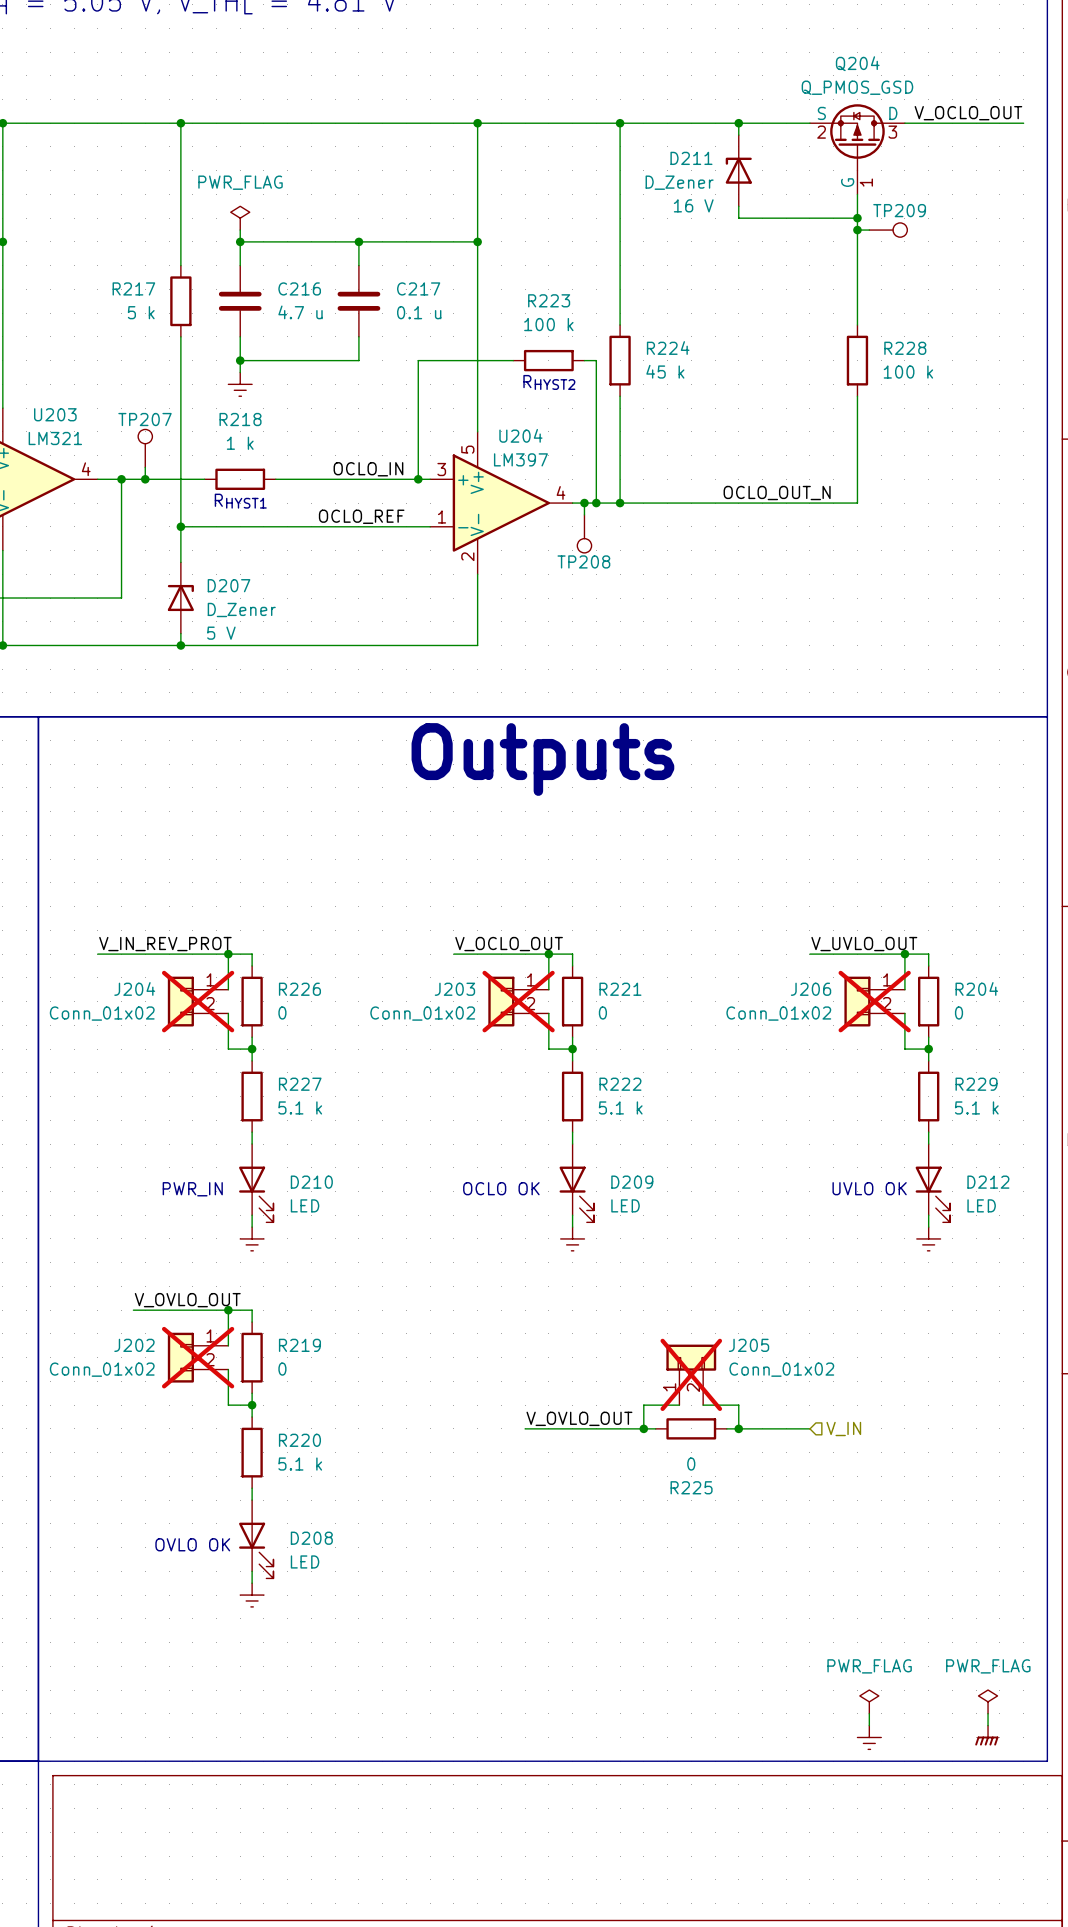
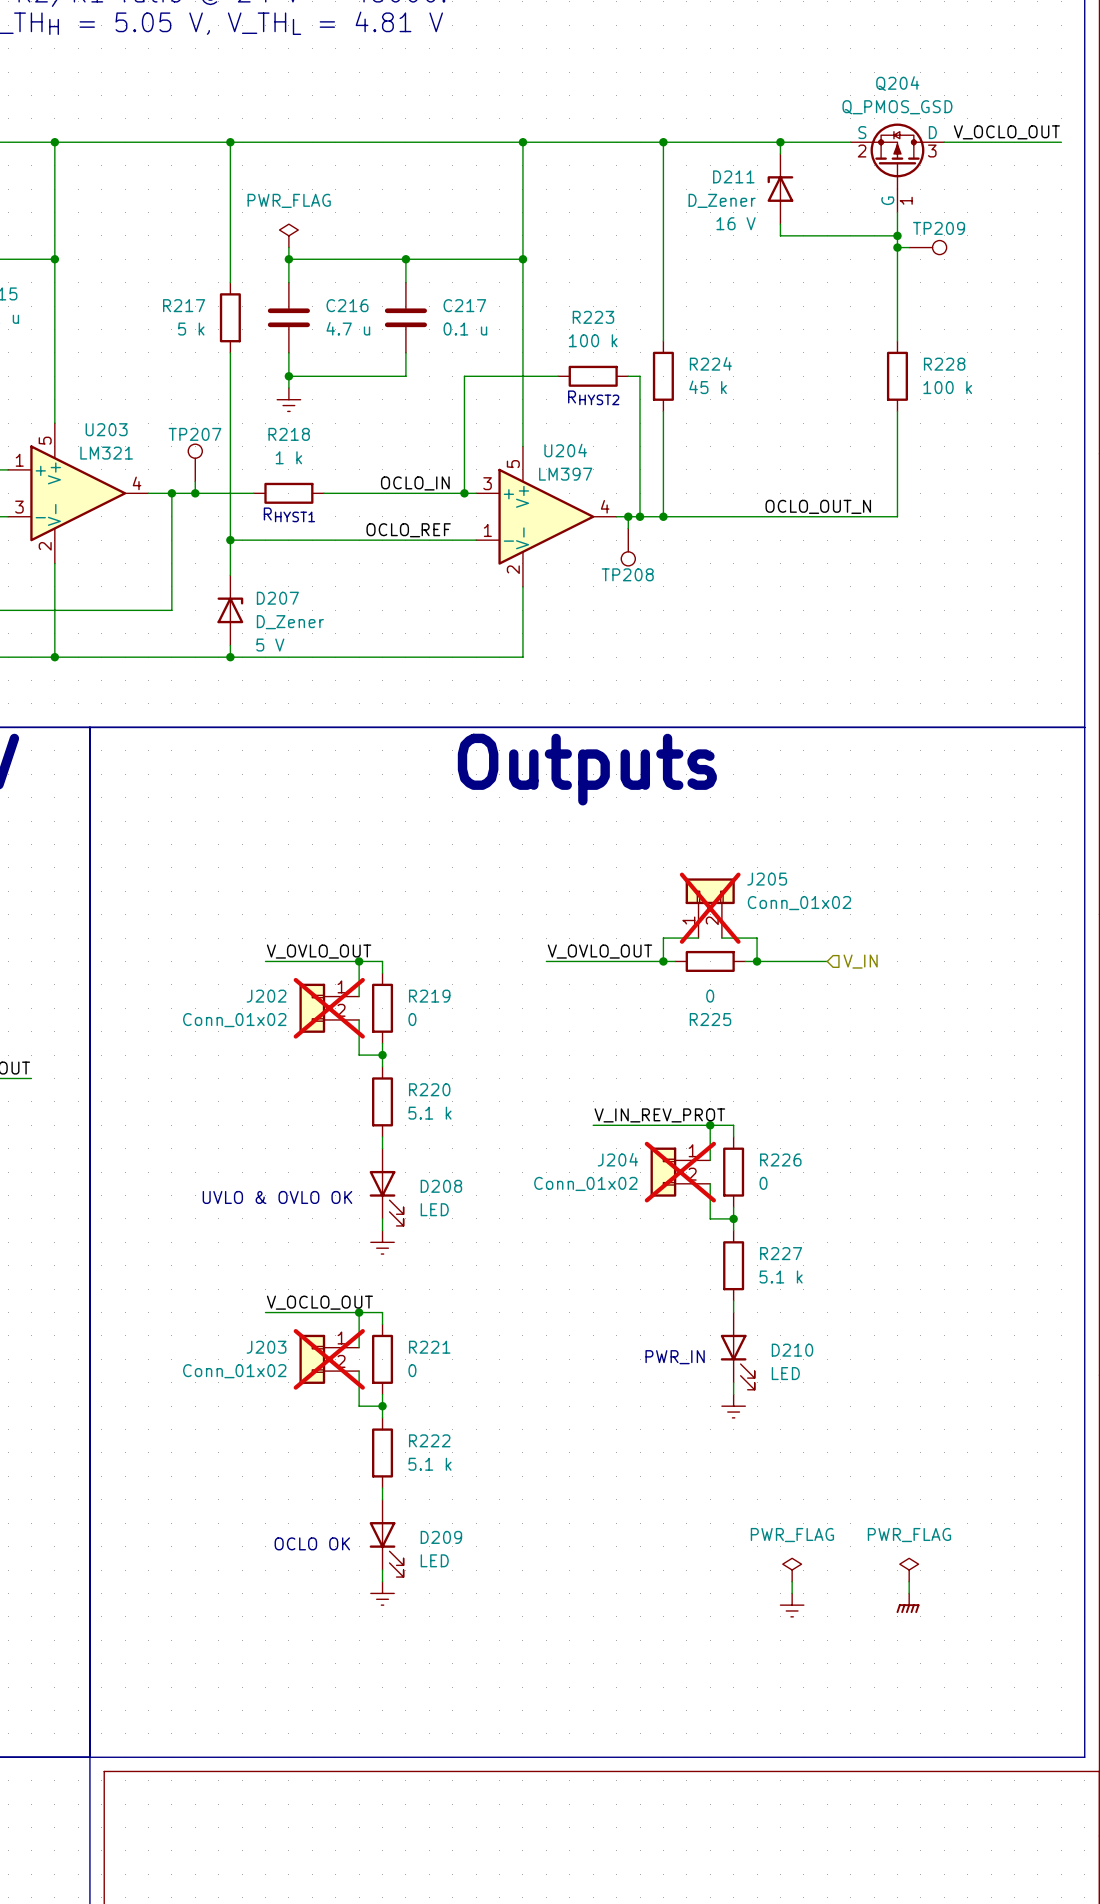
wire: none -> (698, 938) (663, 938) (663, 961)
wire: none -> (721, 938) (757, 938) (757, 961)
label: V_IN_REV_PROT (165, 944) -> none
label: none -> V_OVLO_OUT (319, 951)
label: V_OCLO_OUT (509, 944) -> V_OVLO_OUT (599, 951)
label: V_UVLO_OUT (864, 944) -> none
wire: (97, 954) (216, 954) -> none
wire: (228, 954) (228, 989) -> (359, 961) (359, 996)
junction: (228, 954) -> none
wire: (252, 954) (252, 965) -> (300, 961) (382, 961) (382, 973)
junction: none -> (359, 961)
wire: (453, 954) (501, 954) -> none
wire: (548, 954) (548, 989) -> (710, 1125) (710, 1160)
junction: (548, 954) -> none
wire: (572, 954) (572, 965) -> (616, 961) (675, 961)
junction: none -> (663, 961)
wire: none -> (745, 961) (827, 961)
junction: none -> (757, 961)
wire: (809, 954) (928, 954) (928, 965) -> none
hierarchical label: none -> V_IN (860, 961)
wire: (904, 954) (904, 989) -> none
junction: (904, 954) -> none
J204 position: (198, 1001) -> (680, 1172)
R226 position: (252, 1001) -> (733, 1172)
J203 position: (518, 1001) -> (329, 1359)
R221 position: (572, 1001) -> (382, 1359)
J206: Conn_01x02 (874, 1001) -> none
R204: 0 (928, 1001) -> none
wire: (228, 1013) (228, 1049) (252, 1049) -> (359, 1019) (359, 1055) (382, 1055)
wire: (548, 1013) (548, 1049) (572, 1049) -> (710, 1183) (710, 1218) (733, 1218)
wire: (904, 1013) (904, 1049) (928, 1049) -> none
wire: (252, 1037) (252, 1060) -> (382, 1043) (382, 1066)
wire: (572, 1037) (572, 1060) -> (733, 1207) (733, 1230)
wire: (928, 1037) (928, 1060) -> none
junction: (252, 1049) -> none
junction: none -> (382, 1055)
junction: (572, 1049) -> none
junction: (928, 1049) -> none
R227 position: (252, 1096) -> (733, 1265)
R222 position: (572, 1096) -> (382, 1452)
R229: 5.1 k (928, 1096) -> none
label: none -> V_IN_REV_PROT (659, 1115)
wire: none -> (593, 1125) (733, 1125) (733, 1137)
junction: none -> (710, 1125)
wire: (252, 1132) (252, 1144) -> (382, 1137) (382, 1148)
wire: (572, 1132) (572, 1144) -> (733, 1300) (733, 1312)
wire: (928, 1132) (928, 1144) -> none
D210 position: (256, 1183) -> (737, 1351)
D209 position: (576, 1183) -> (386, 1538)
D212: LED (932, 1183) -> none
text: OCLO OK (501, 1188) -> none
text: UVLO OK (869, 1188) -> none
text: PWR_IN (192, 1189) -> none
text: none -> UVLO & OVLO OK (277, 1197)
wire: (252, 1215) (252, 1227) -> (382, 1218) (382, 1230)
wire: (572, 1215) (572, 1227) -> (733, 1382) (733, 1394)
junction: none -> (733, 1218)
wire: (928, 1215) (928, 1227) -> none
power symbol position: (252, 1238) -> (382, 1242)
power symbol: (572, 1238) -> none
power symbol: (928, 1238) -> none
label: V_OVLO_OUT (187, 1300) -> V_OCLO_OUT (319, 1302)
wire: (133, 1310) (216, 1310) -> none
wire: (228, 1310) (228, 1345) -> (359, 1312) (359, 1347)
junction: (228, 1310) -> none
wire: (252, 1310) (252, 1322) -> (300, 1312) (382, 1312) (382, 1324)
junction: none -> (359, 1312)
text: none -> PWR_IN (675, 1357)
J202 position: (198, 1357) -> (329, 1008)
R219 position: (252, 1357) -> (382, 1008)
wire: (228, 1369) (228, 1405) (252, 1405) -> (359, 1371) (359, 1406) (382, 1406)
J205 position: (691, 1374) -> (710, 908)
wire: (252, 1393) (252, 1417) -> (382, 1394) (382, 1417)
junction: (252, 1405) -> none
junction: none -> (382, 1406)
wire: (679, 1405) (643, 1405) (643, 1428) -> none
power symbol: none -> (733, 1406)
wire: (703, 1405) (738, 1405) (738, 1428) -> none
label: V_OVLO_OUT (579, 1418) -> none
wire: (525, 1428) (655, 1428) -> none
junction: (643, 1428) -> none
R225 position: (691, 1428) -> (710, 961)
wire: (726, 1428) (809, 1428) -> none
junction: (738, 1428) -> none
hierarchical label: V_IN (843, 1429) -> none
R220 position: (252, 1452) -> (382, 1101)
wire: (252, 1488) (252, 1500) -> (382, 1488) (382, 1499)
D208 position: (256, 1539) -> (386, 1187)
text: OVLO OK (192, 1544) -> OCLO OK (312, 1543)
wire: (252, 1571) (252, 1583) -> (382, 1570) (382, 1581)
power symbol: none -> PWR_FLAG (792, 1570)
power symbol: none -> PWR_FLAG (909, 1570)
power symbol position: (252, 1595) -> (382, 1593)
power symbol: PWR_FLAG (869, 1701) -> none
power symbol: PWR_FLAG (988, 1701) -> none
wire: (869, 1713) (869, 1725) -> (792, 1581) (792, 1593)
wire: (988, 1713) (988, 1725) -> (909, 1581) (909, 1593)
power symbol position: (986, 1735) -> (908, 1603)
power symbol position: (869, 1737) -> (792, 1605)

